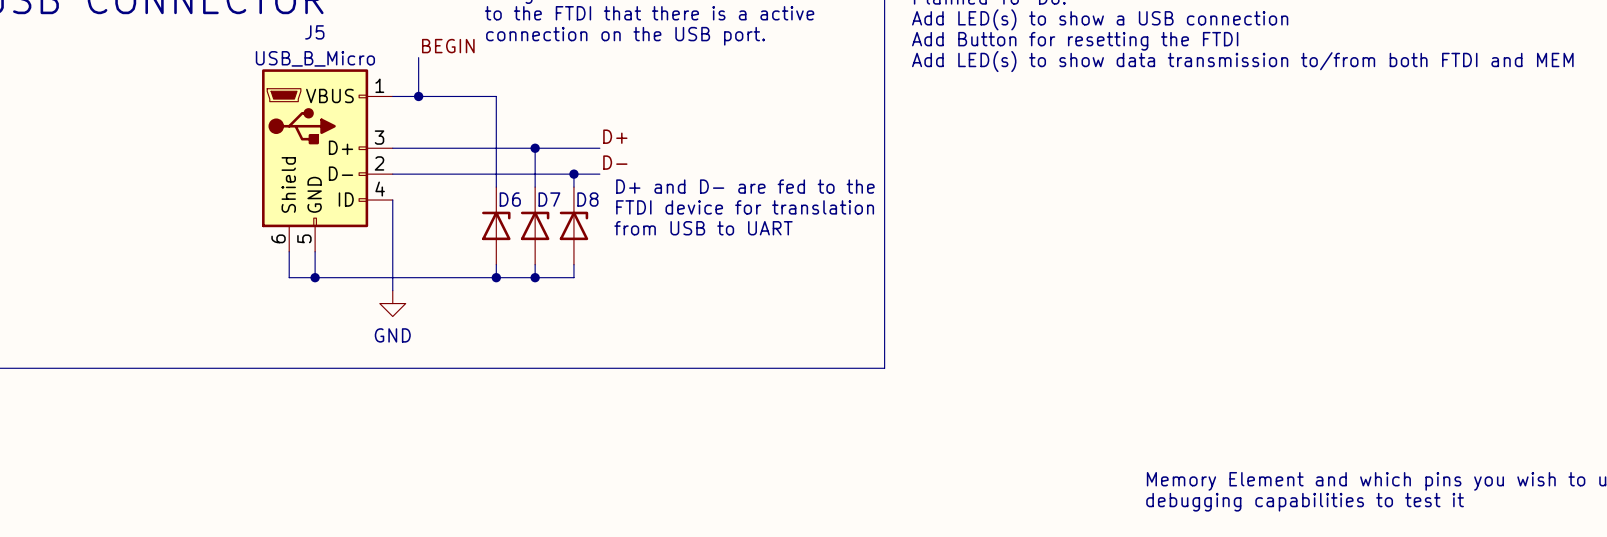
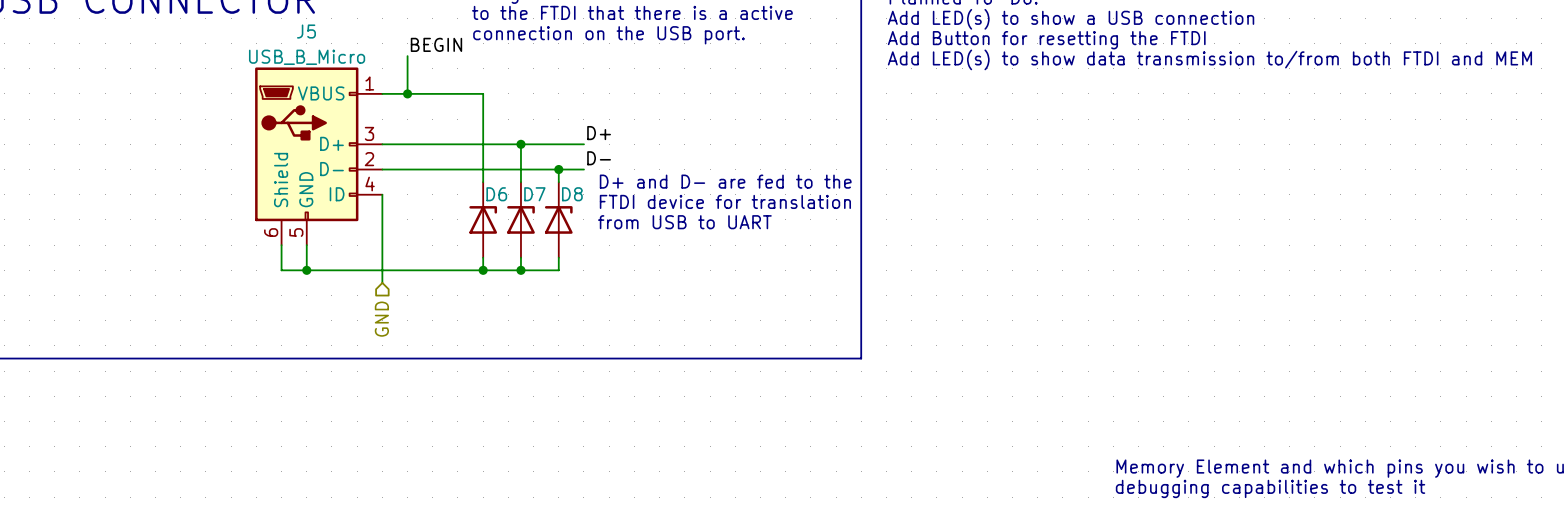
power symbol: GND (392, 303) -> none
hierarchical label: none -> GND (381, 319)

